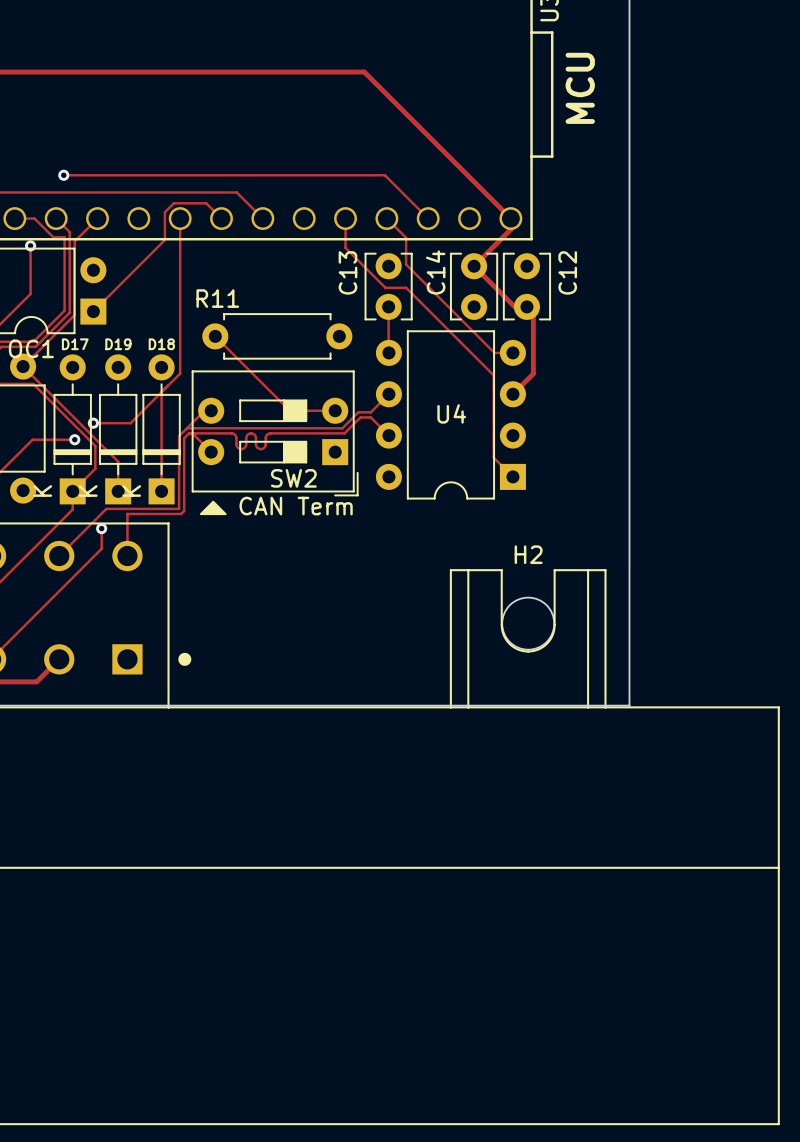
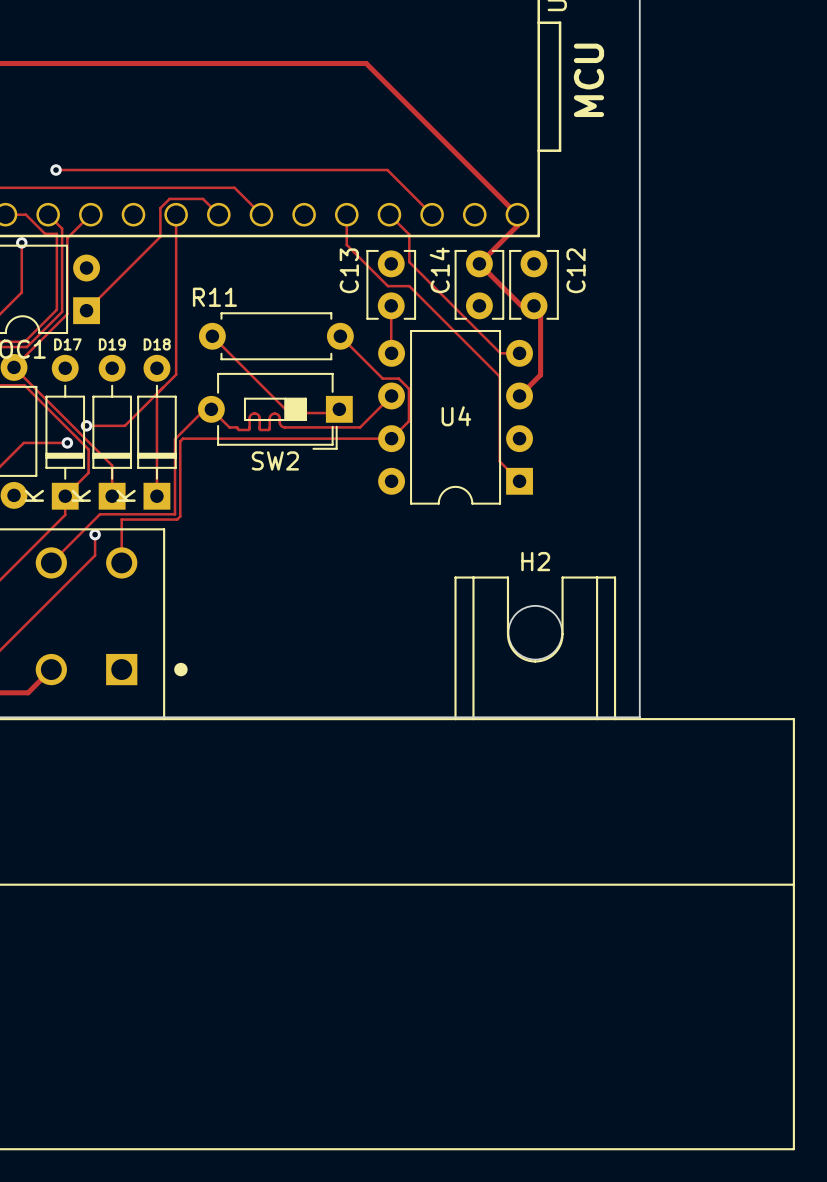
SW2 footprint: [191, 370, 359, 497] -> [197, 372, 353, 450]
track: (370, 412) (358, 412) (342, 428) (186, 428) -> (372, 414) (360, 427) (284, 427) (280, 424) (278, 415) (274, 413) (269, 417) (269, 429) (260, 429) (259, 416) (253, 413) (249, 417) (249, 429) (239, 429) (236, 427) (229, 427) (211, 409)
track: (192, 433) (211, 452) -> none
track: (186, 435) (189, 433) (232, 433) (236, 436) (237, 446) (241, 449) (245, 446) (246, 435) (251, 433) (255, 436) (256, 446) (261, 449) (265, 446) (265, 436) (269, 433) (344, 433) (360, 417) (370, 417) (388, 435) -> (183, 438) (391, 438) (408, 421) (408, 388) (398, 378) (382, 378) (340, 336)
drawing: [199, 500, 227, 516] -> none
text: CAN Term (296, 506) -> none

